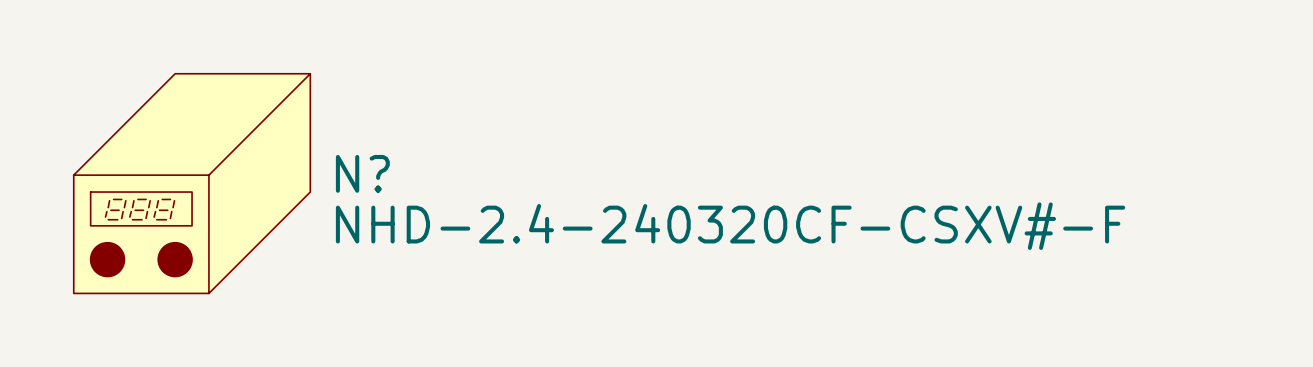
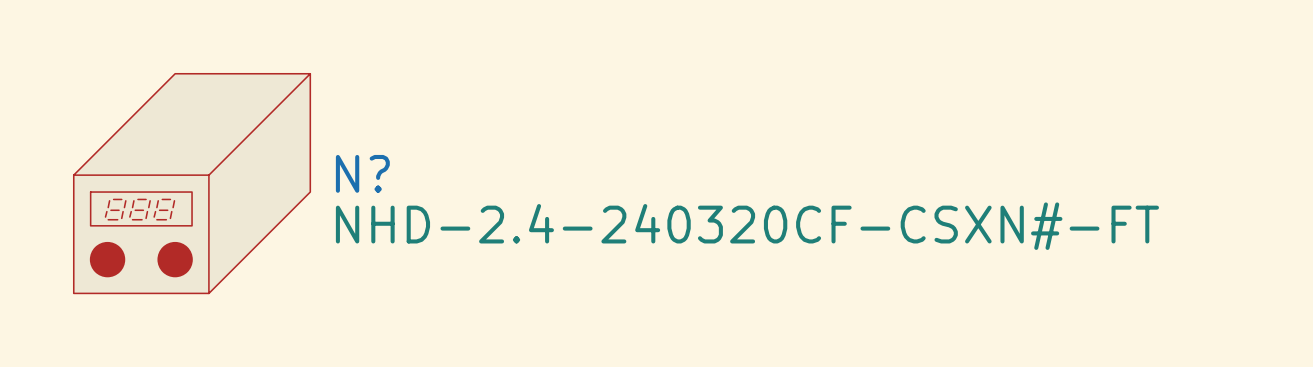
N? value: NHD-2.4-240320CF-CSXV#-F (730, 226) -> NHD-2.4-240320CF-CSXN#-FT (747, 226)

